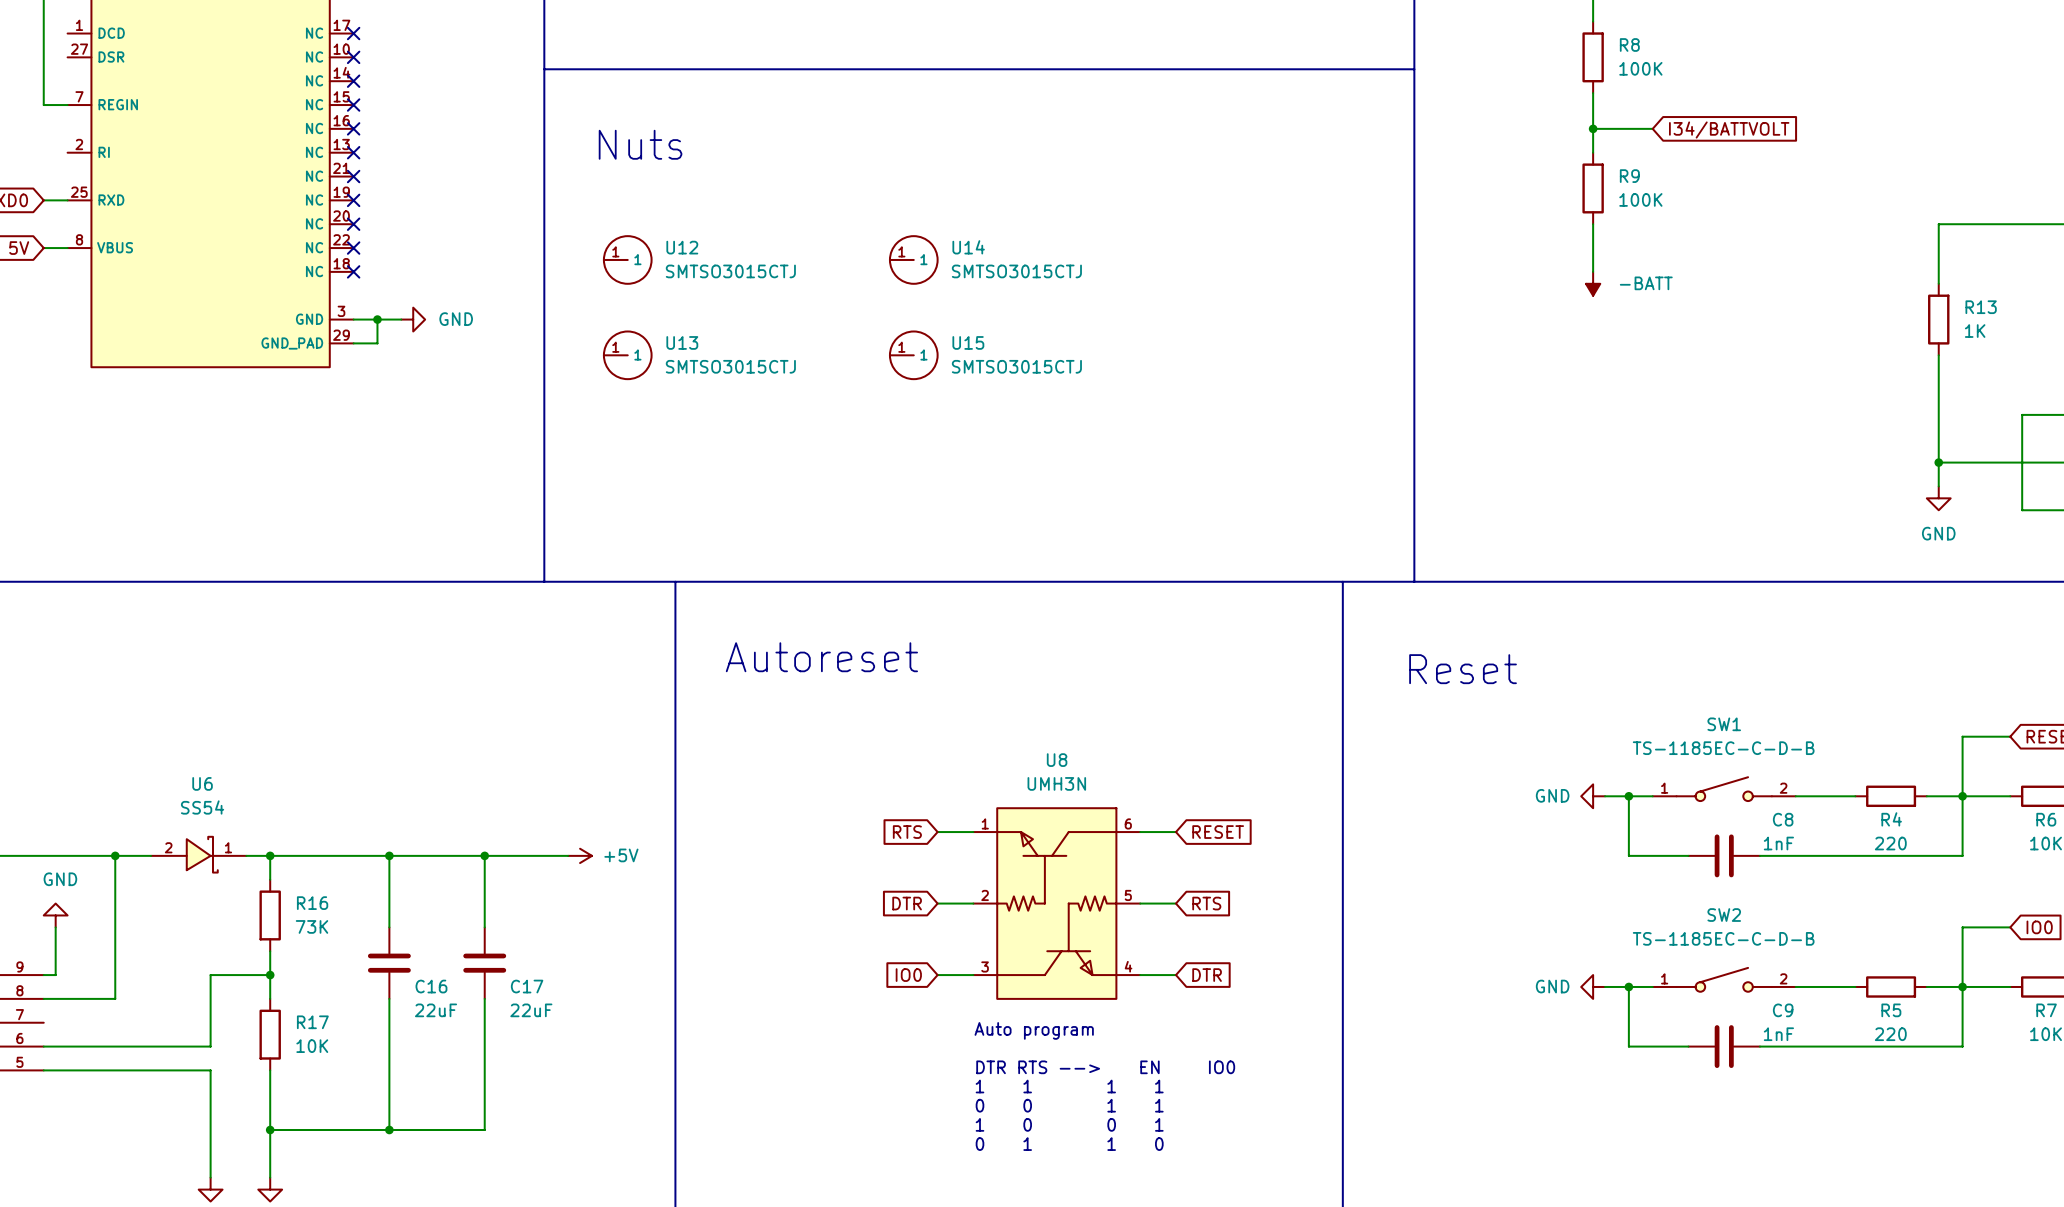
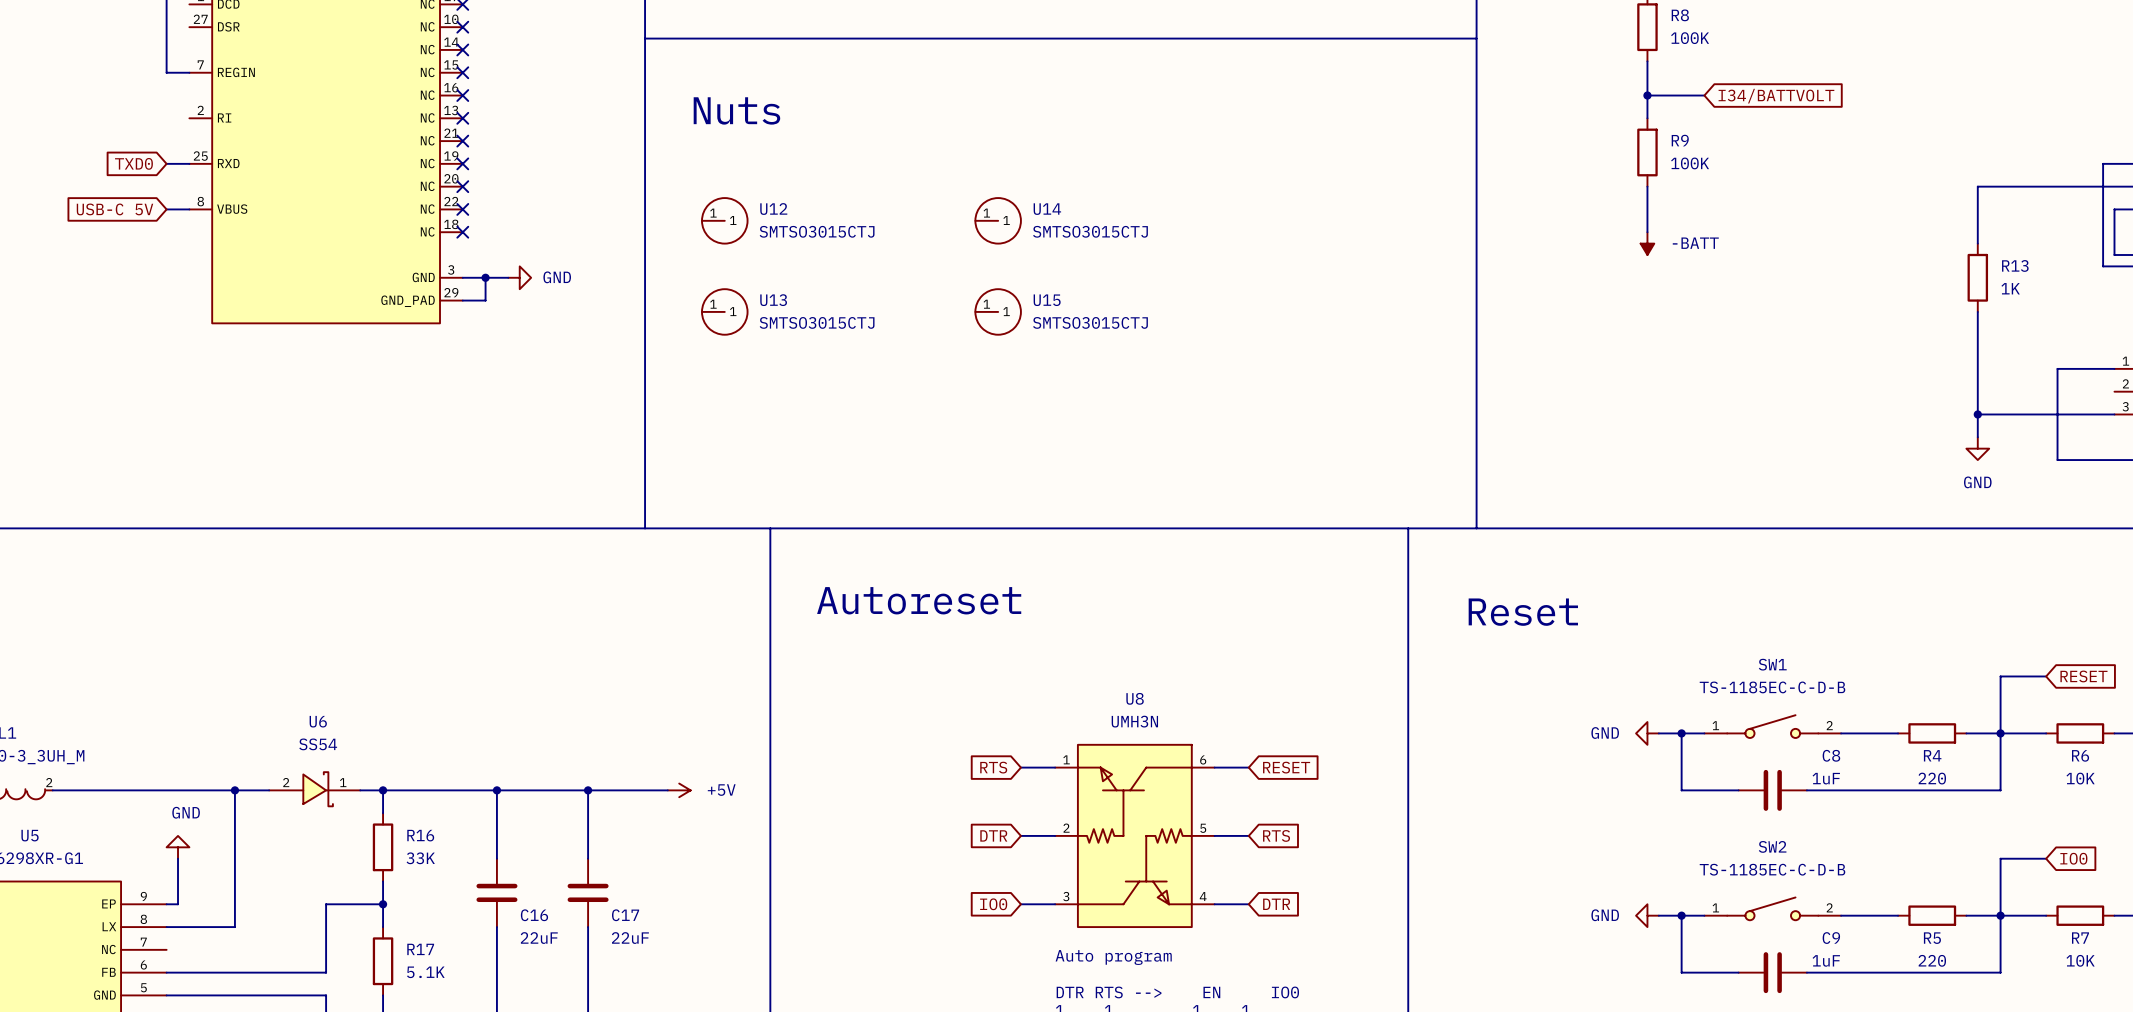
C8 value: 1nF (1778, 843) -> 1uF (1826, 778)
R16 value: 73K (312, 926) -> 33K (420, 858)
C9 value: 1nF (1778, 1034) -> 1uF (1826, 960)
R17 value: 10K (312, 1046) -> 5.1K (425, 972)

